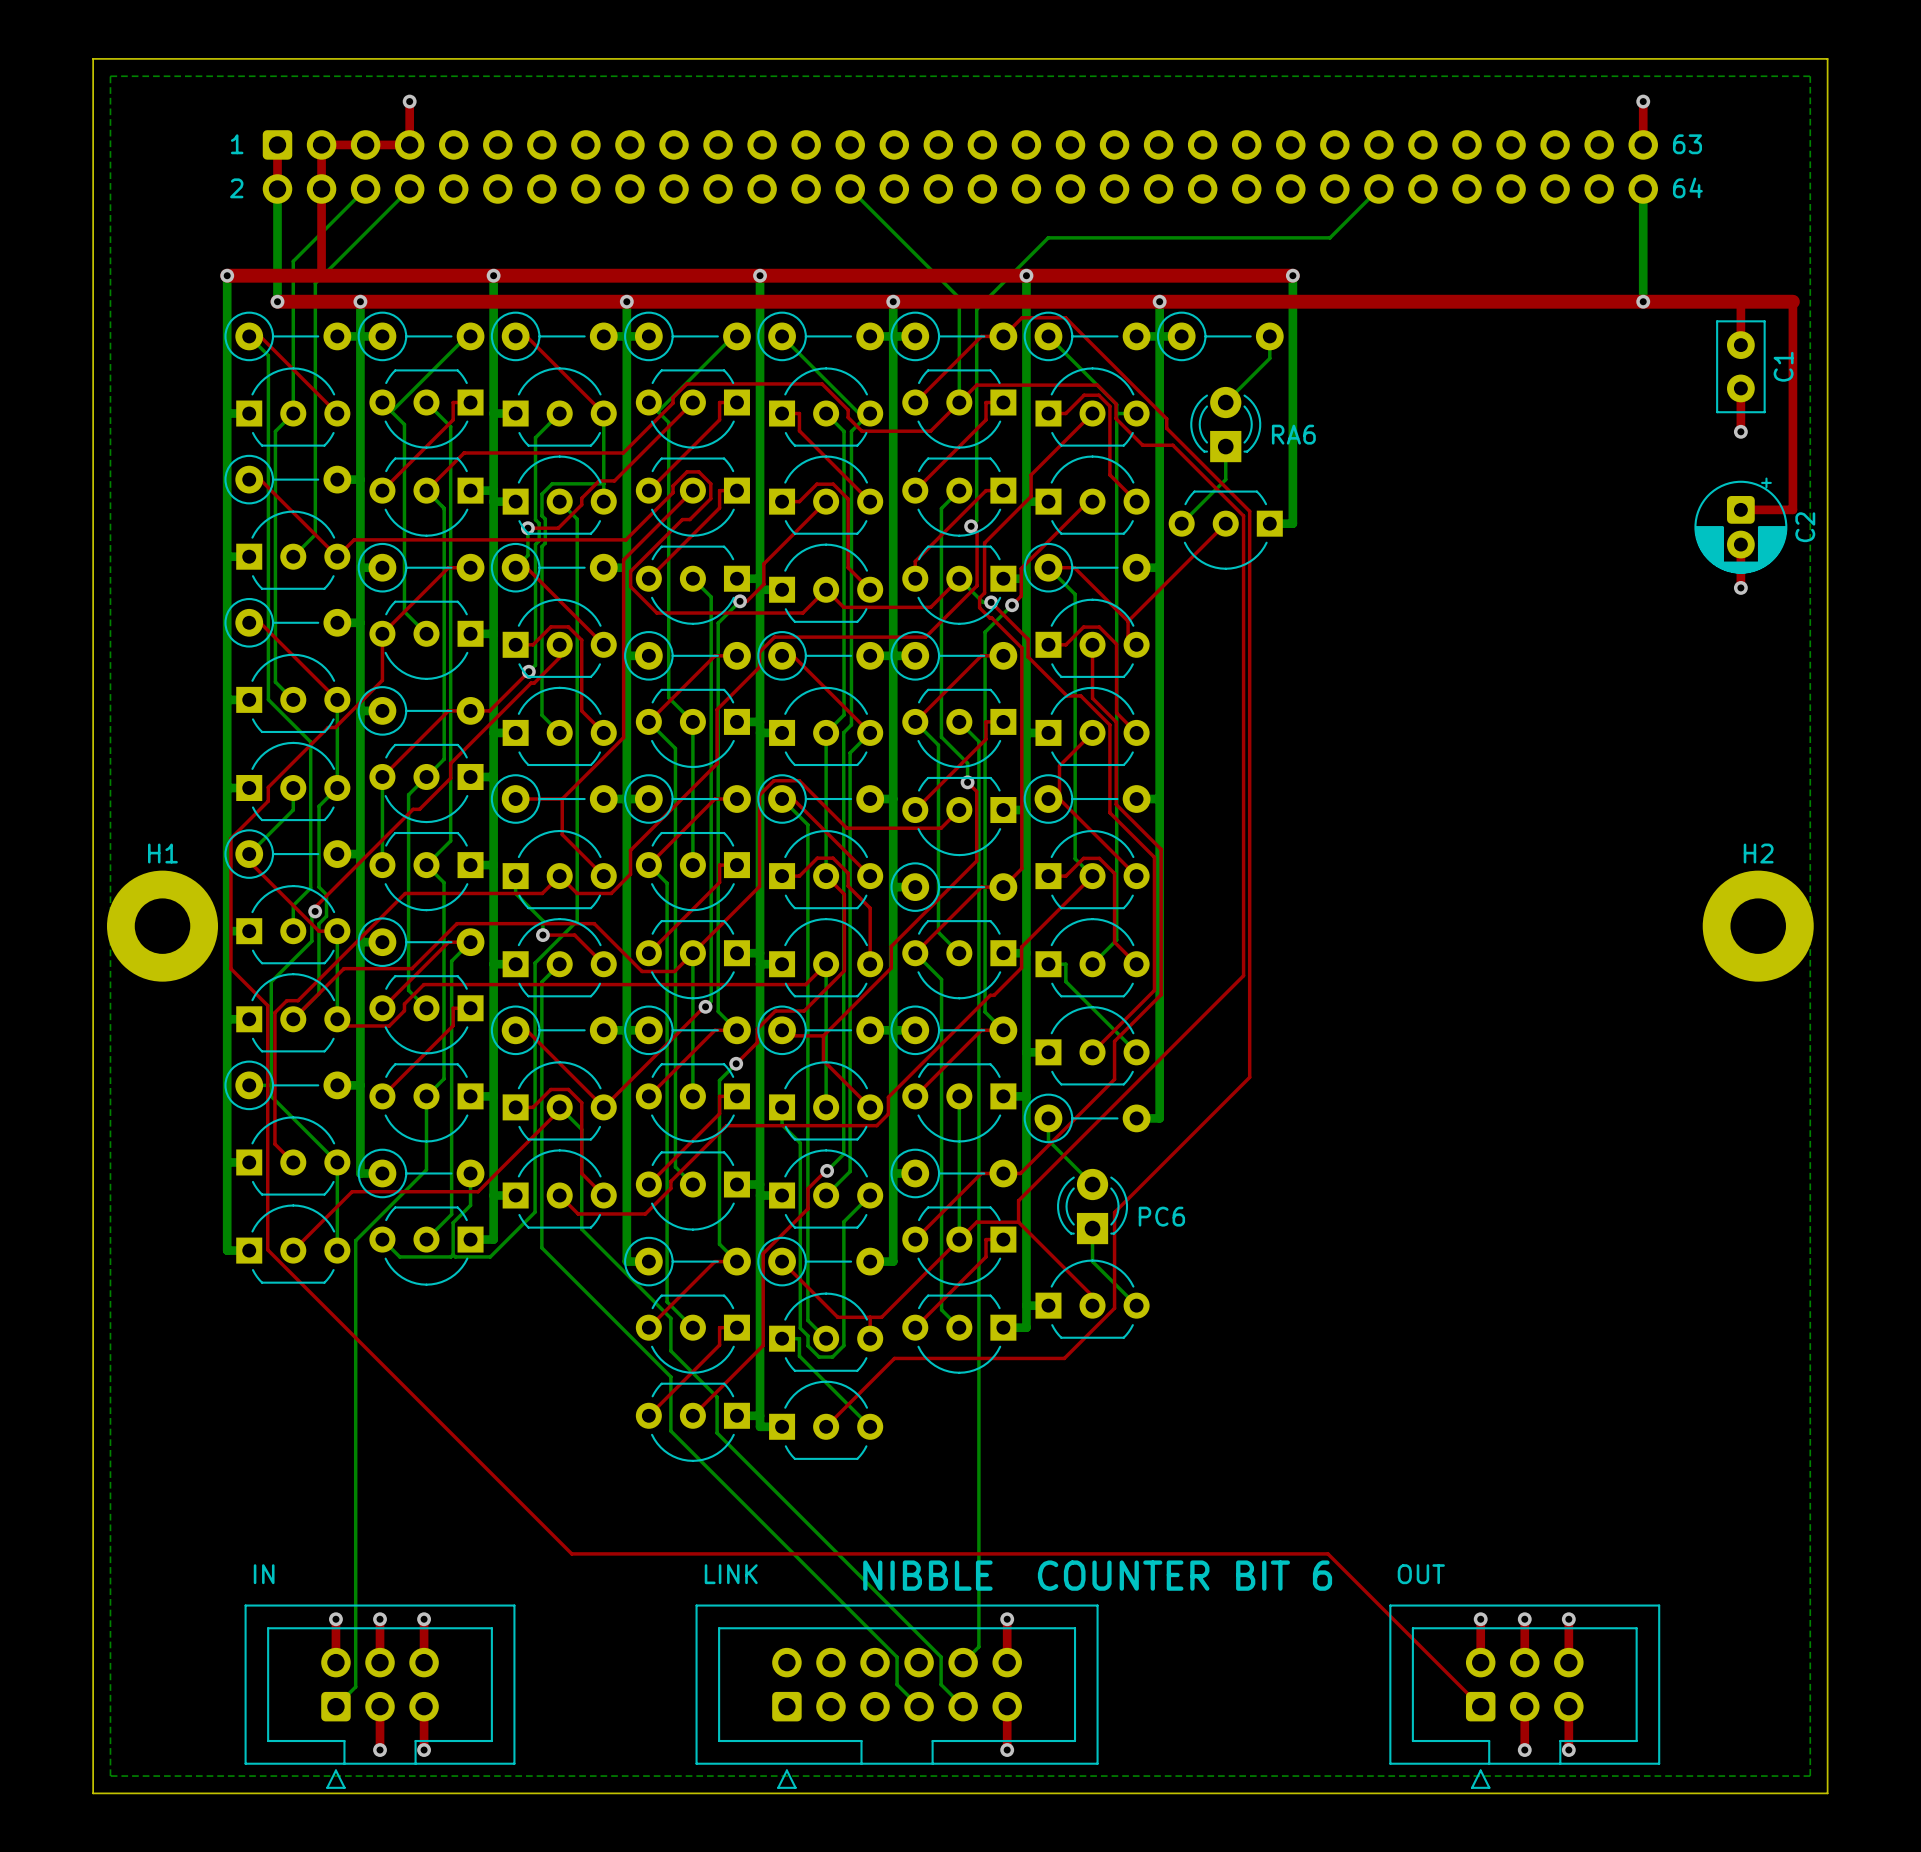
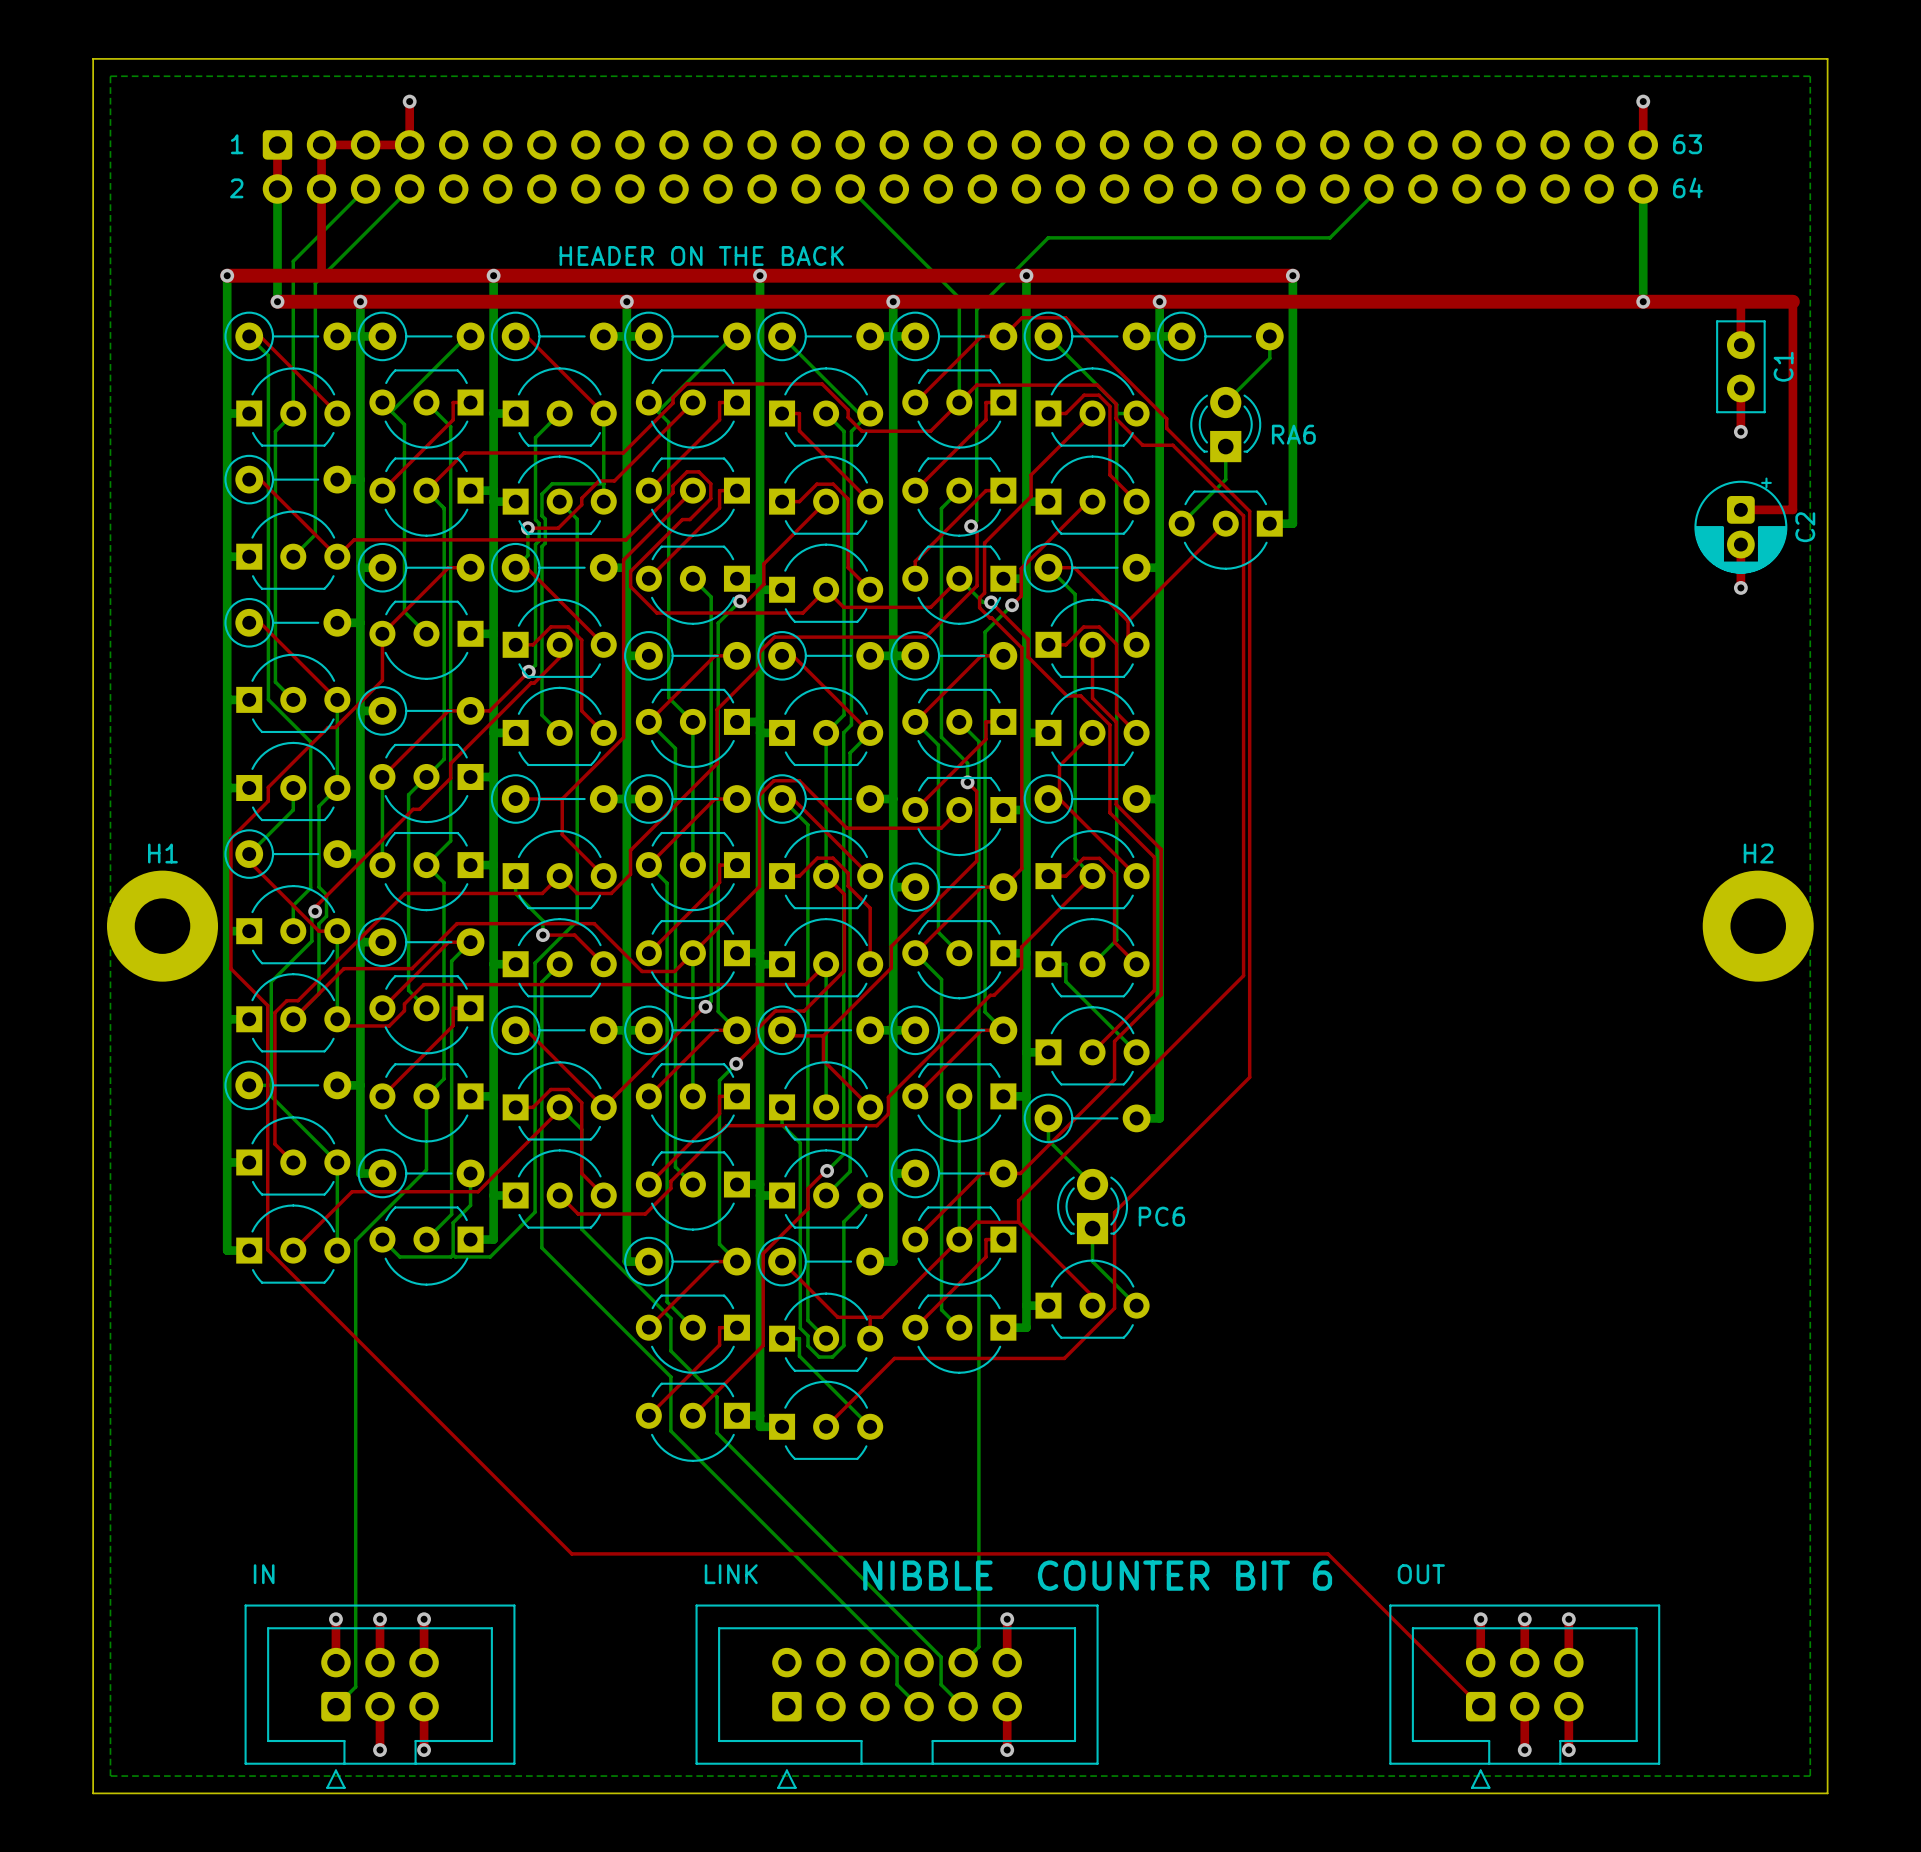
text: none -> HEADER ON THE BACK (701, 255)

